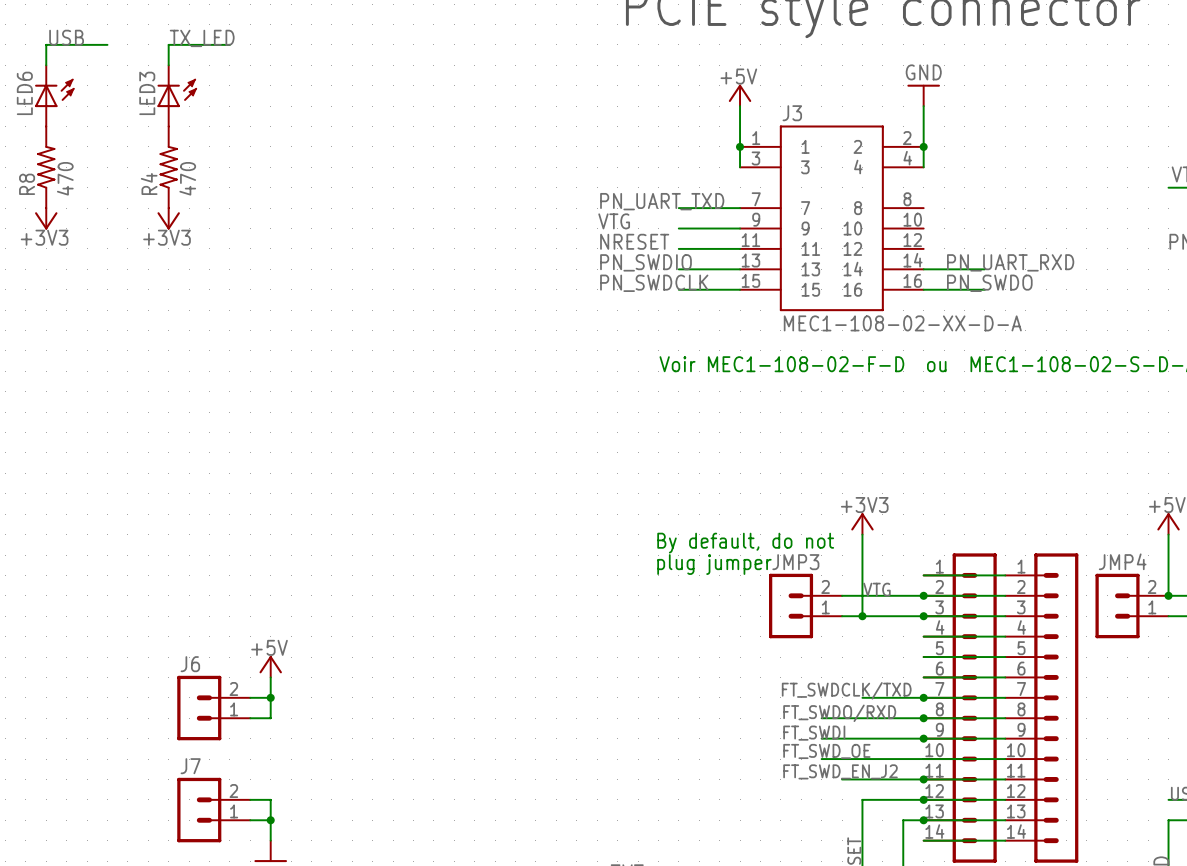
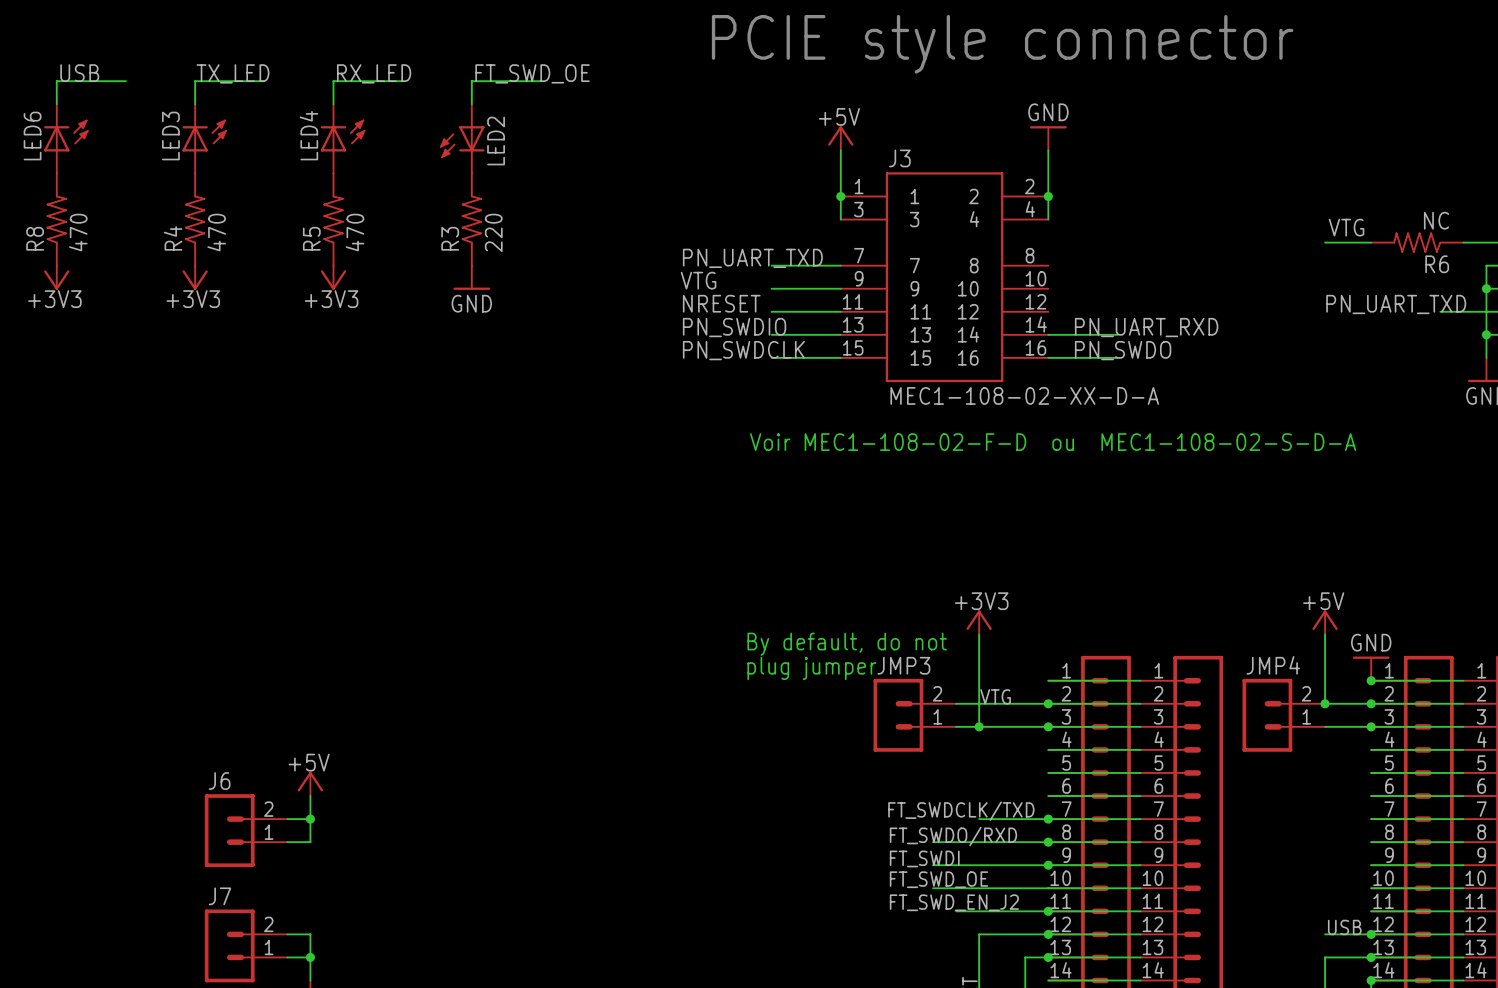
label: none -> RX_LED (374, 73)
label: none -> FT_SWD_OE (532, 73)
wire: none -> (402, 81) (333, 81) (333, 104)
wire: none -> (541, 81) (471, 81) (471, 104)
LED4: none -> (343, 138)
LED2: none -> (462, 138)
R5: none -> 470 (333, 219)
R3: none -> 220 (471, 219)
power symbol: none -> +3V3 (333, 277)
power symbol: none -> GND (471, 277)

